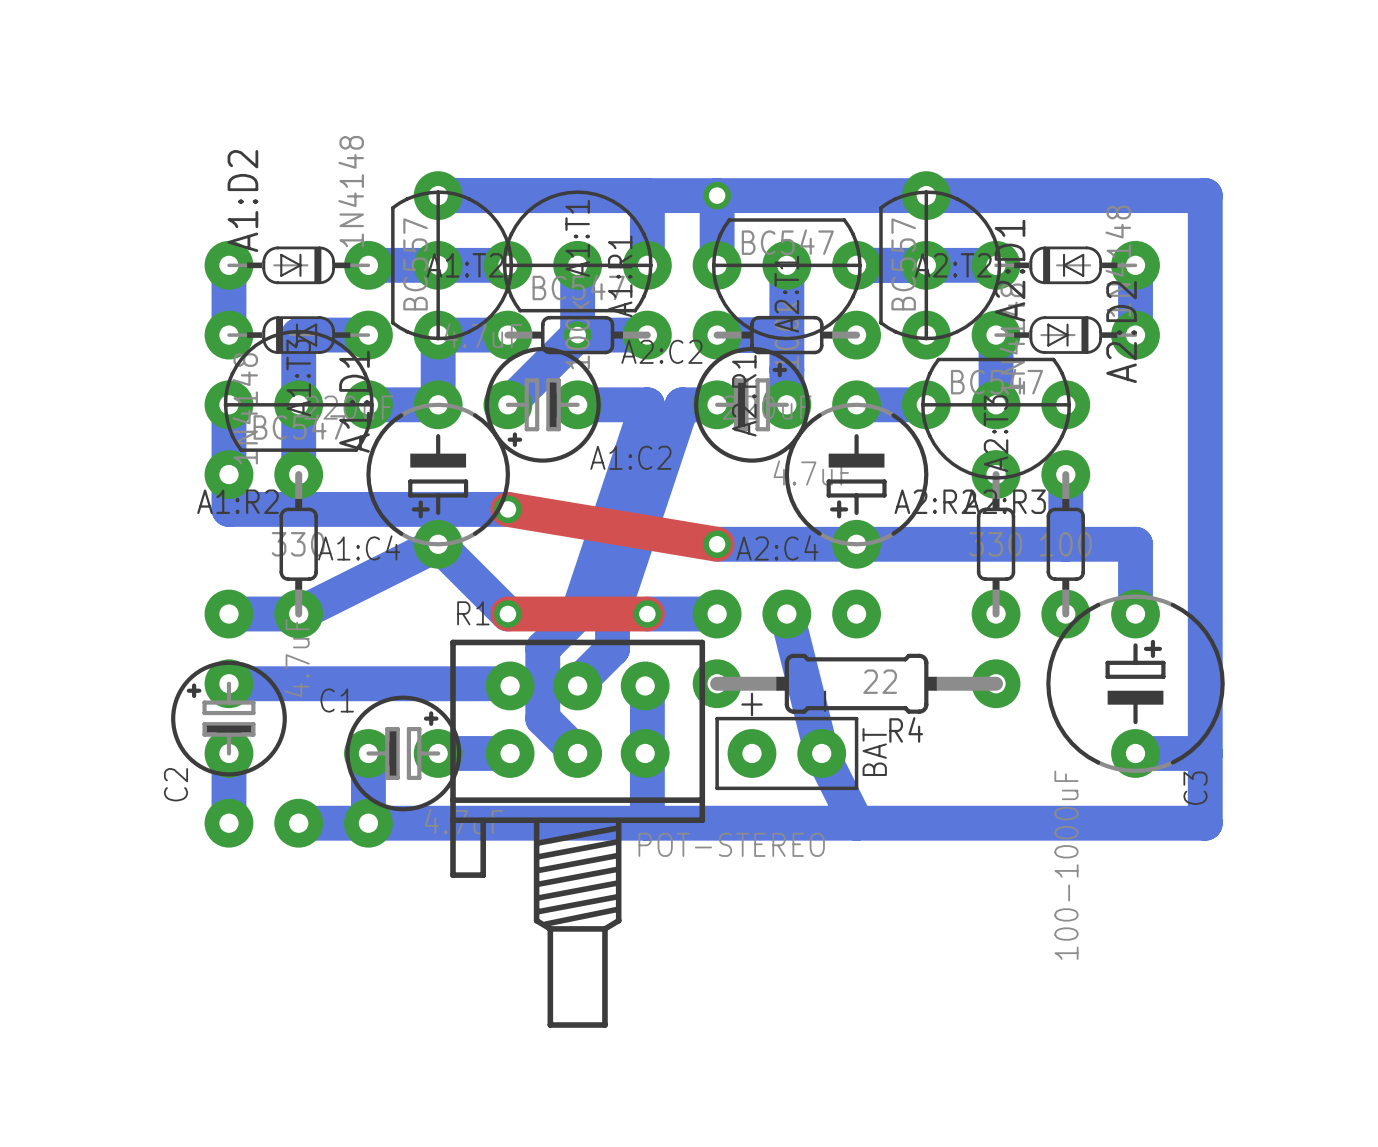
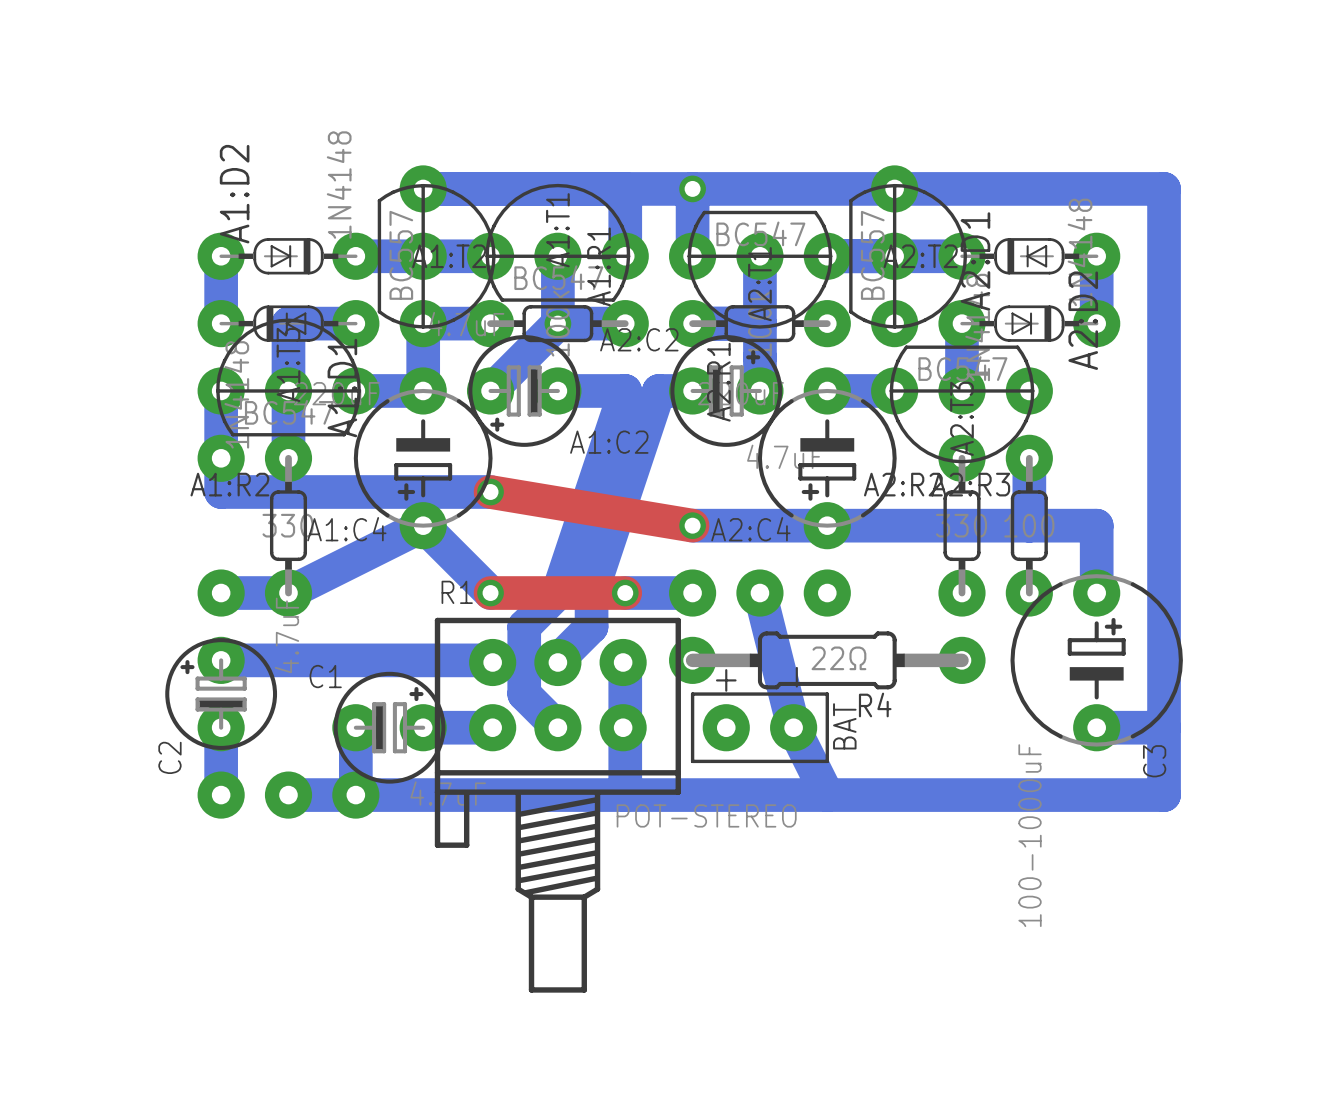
R4 value: 22 (880, 681) -> 22Ω (838, 658)

